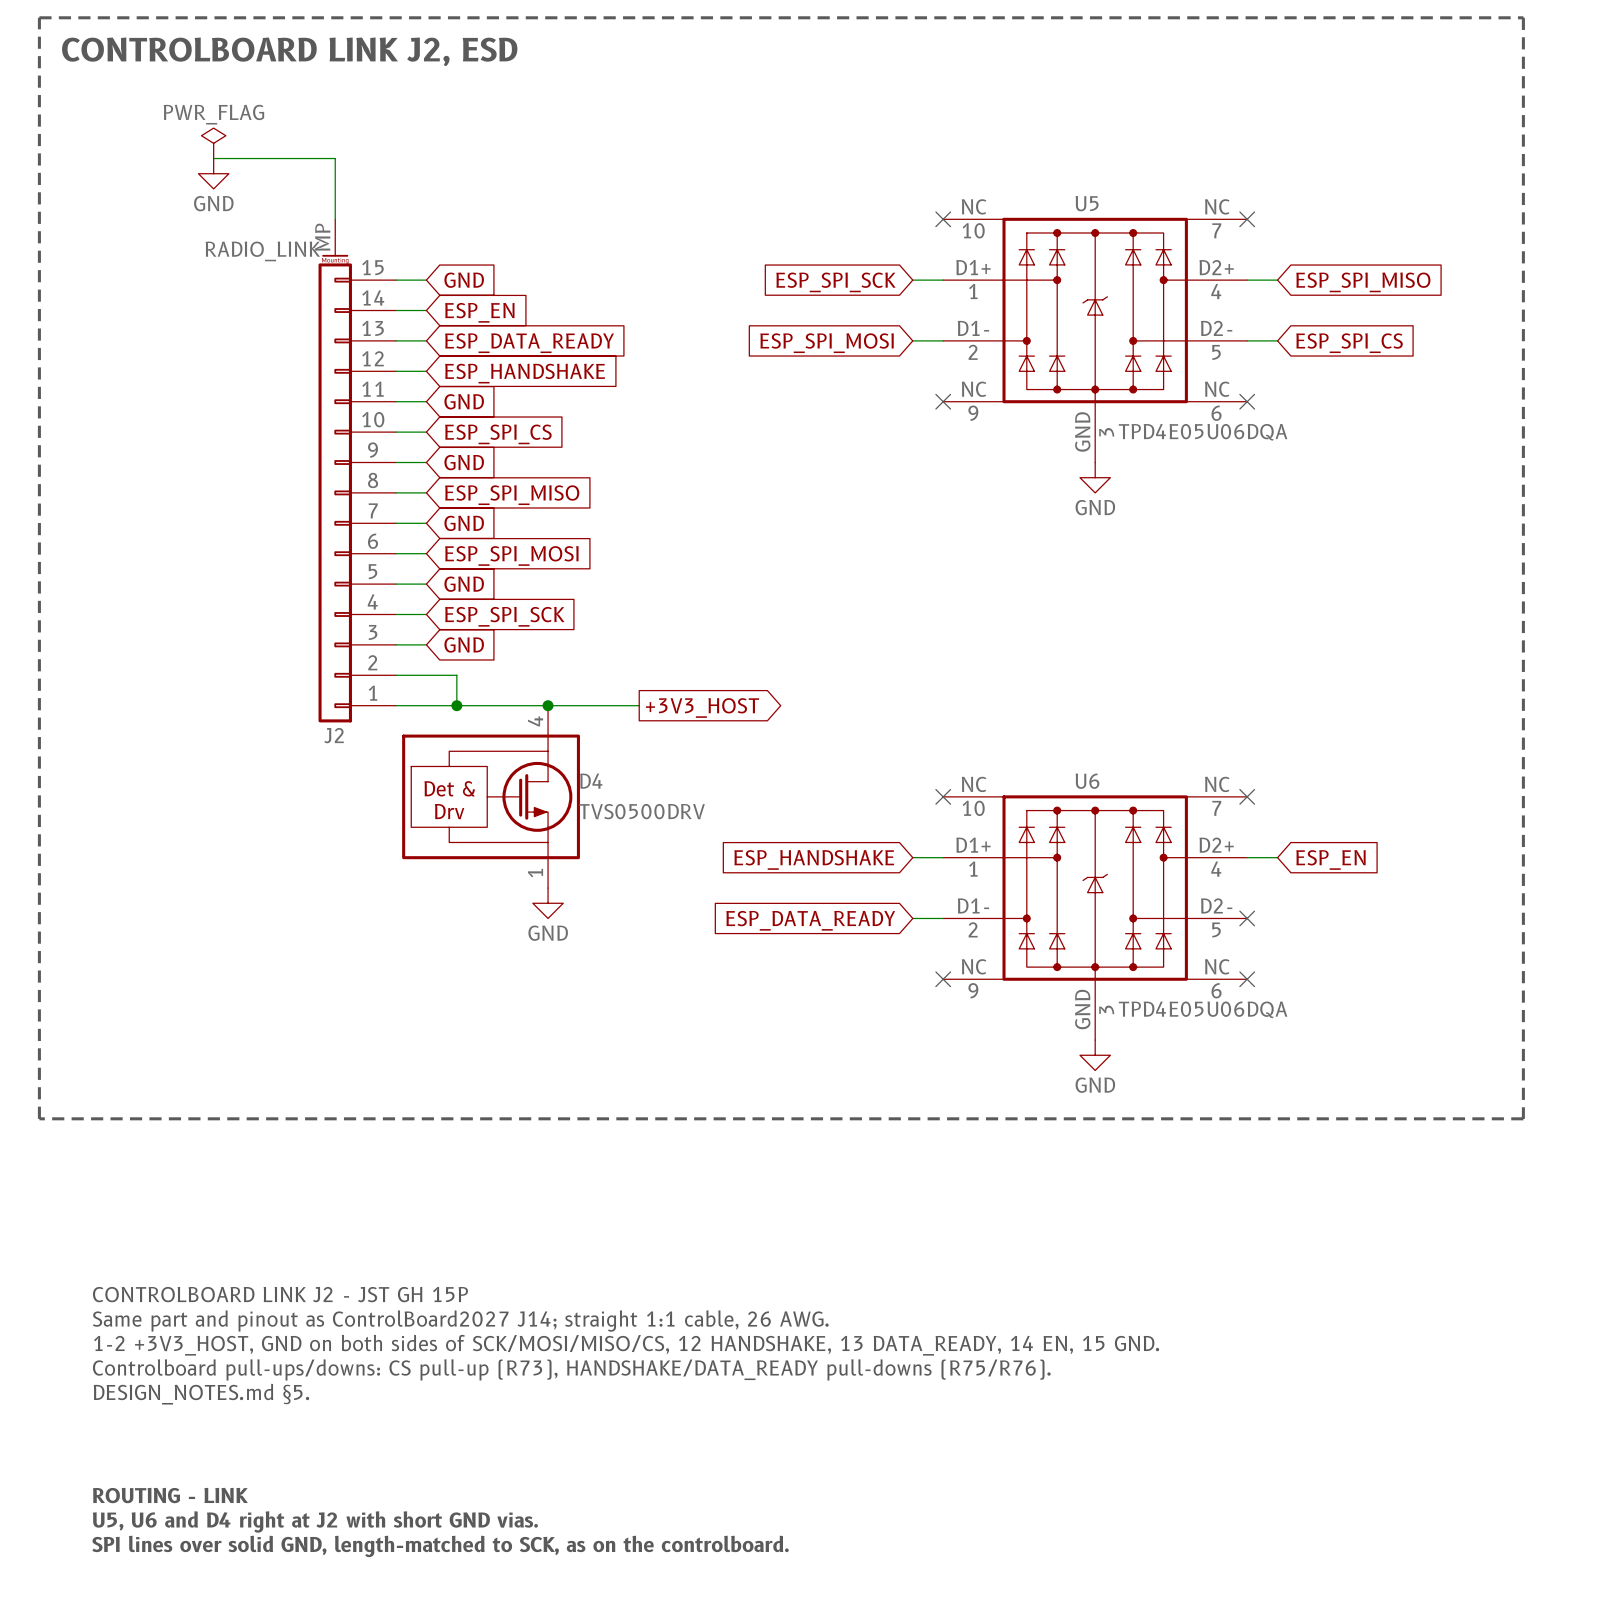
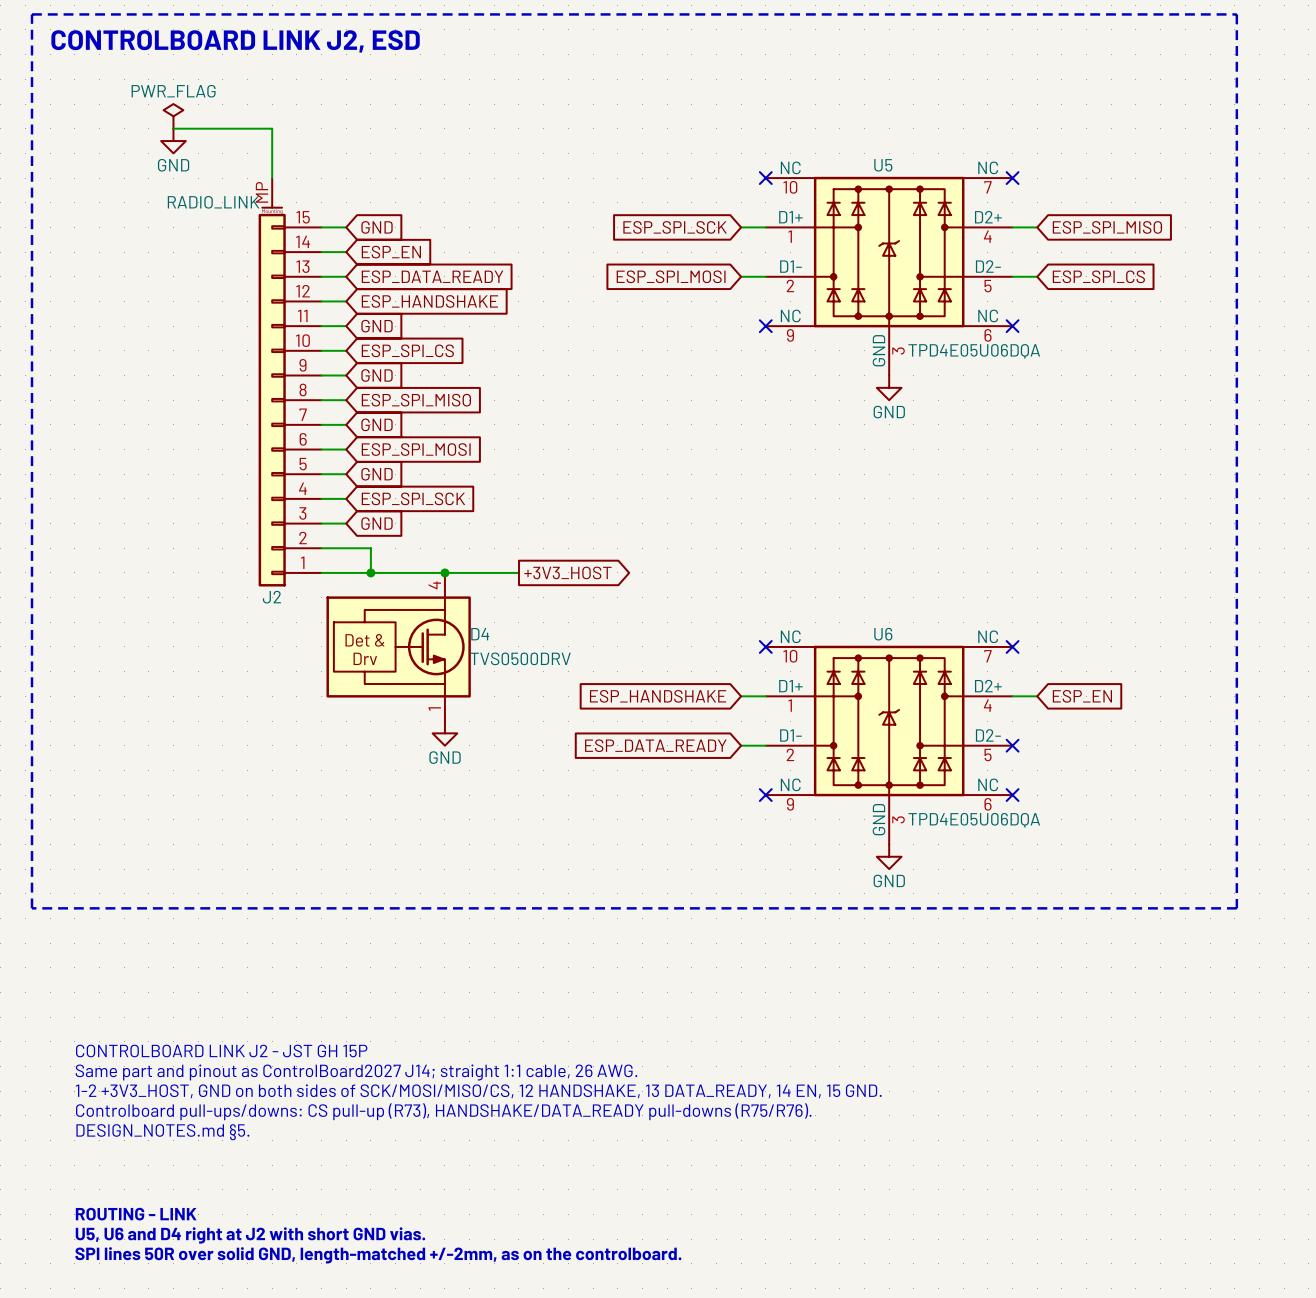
text: SPI lines over solid GND, length-matched to SCK, as on the controlboard. (440, 1546) -> SPI lines 50R over solid GND, length-matched +/-2mm, as on the controlboard. (378, 1255)

